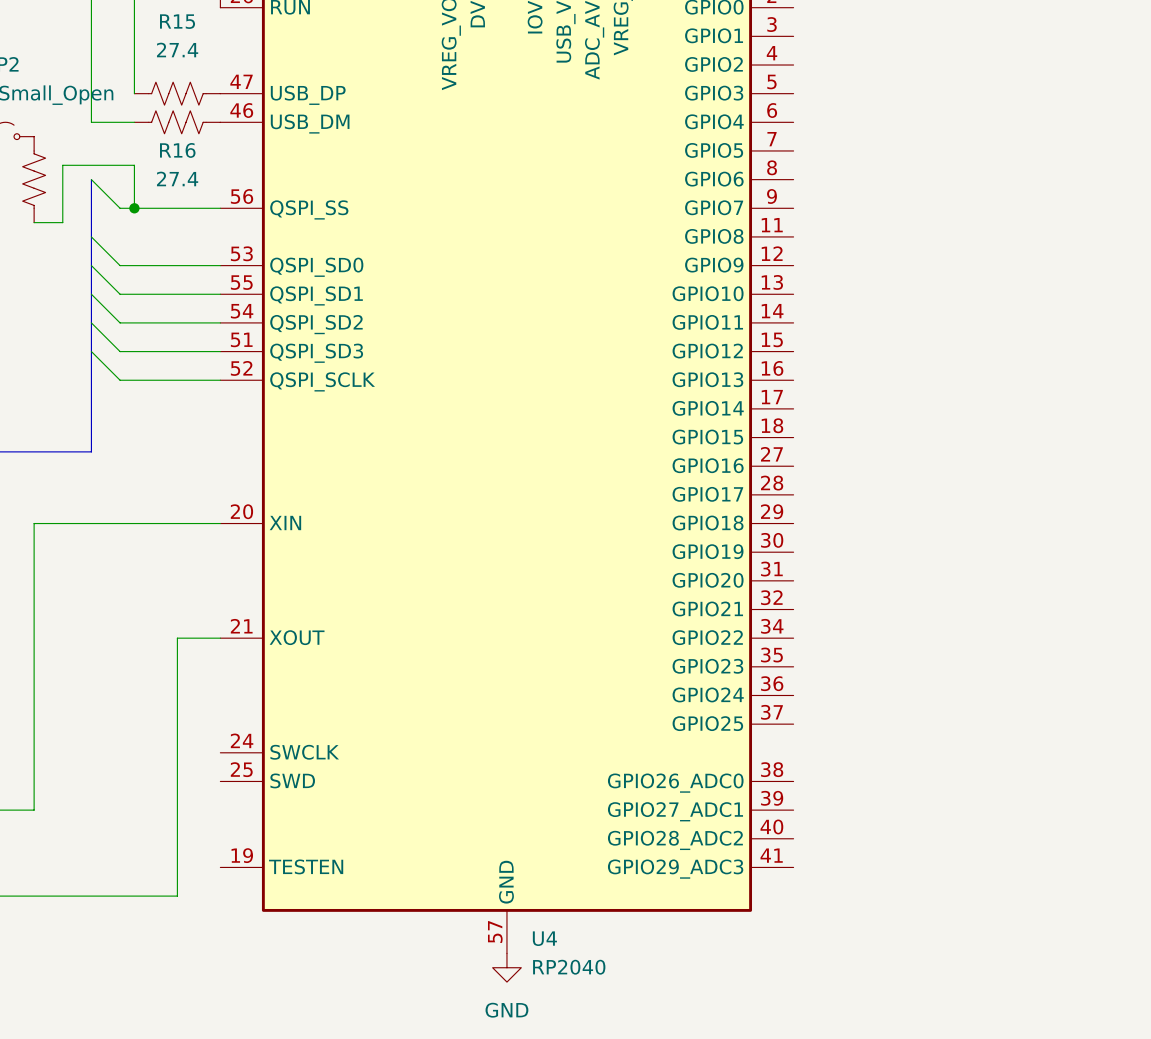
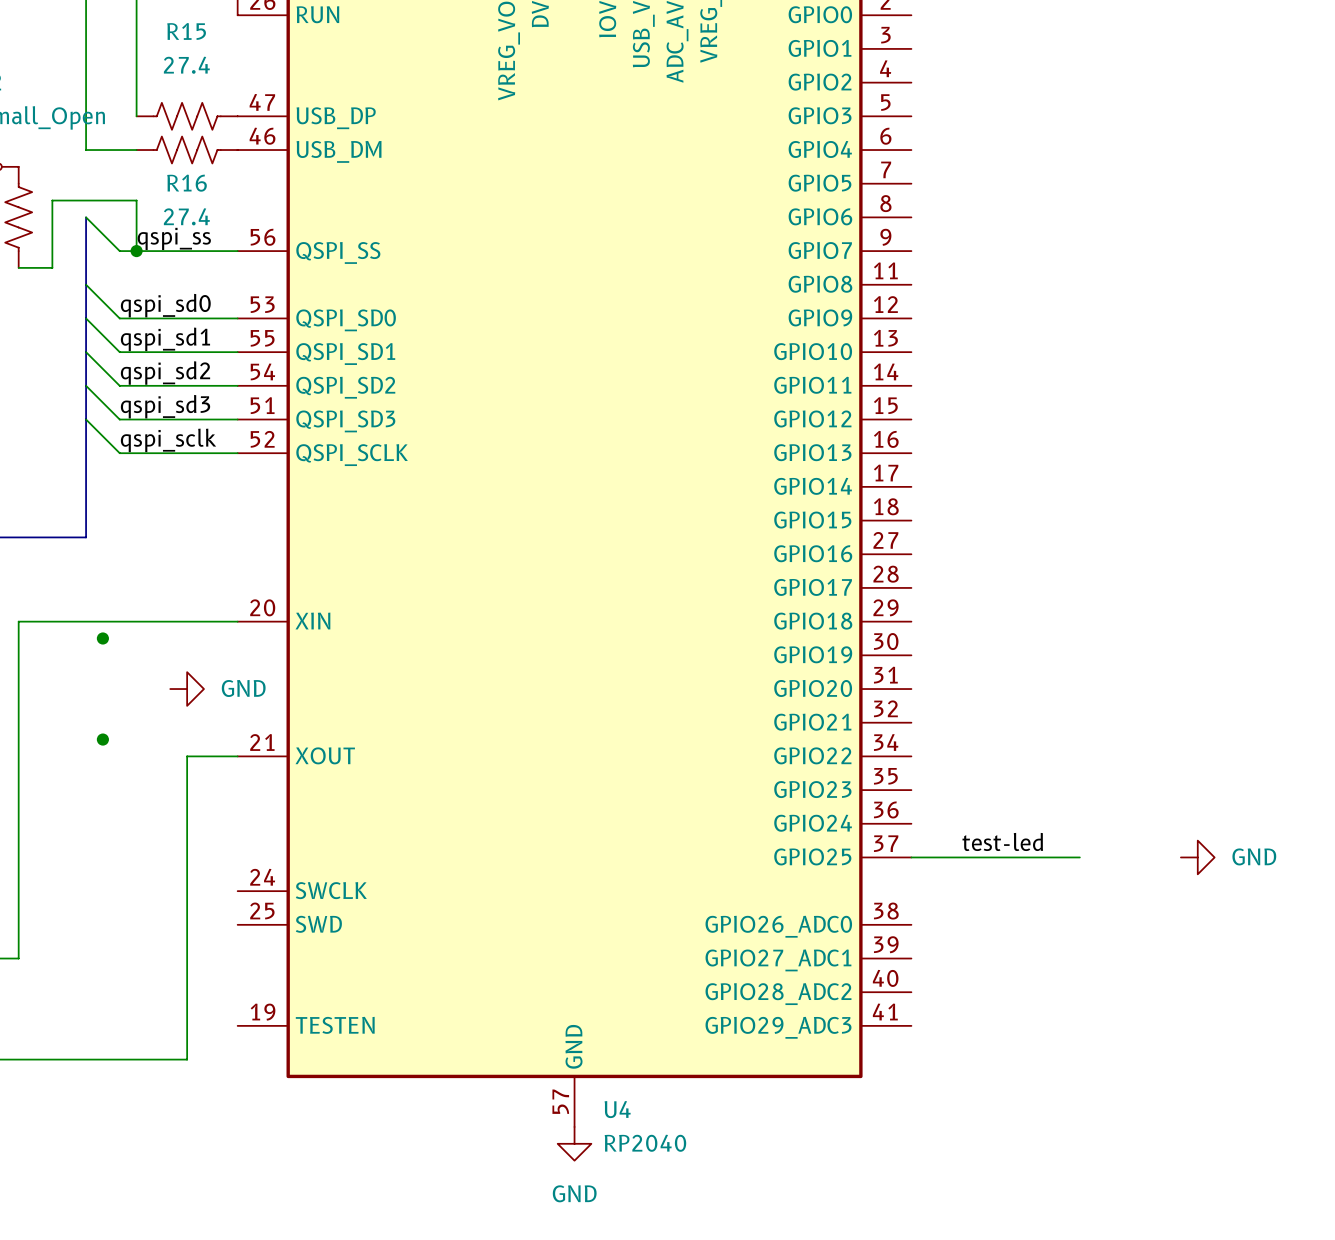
label: none -> qspi_ss (174, 238)
label: none -> qspi_sd0 (165, 305)
label: none -> qspi_sd1 (165, 339)
label: none -> qspi_sd2 (165, 373)
label: none -> qspi_sd3 (165, 406)
label: none -> qspi_sclk (168, 440)
junction: none -> (102, 638)
power symbol: none -> GND (187, 689)
junction: none -> (102, 739)
label: none -> test-led (1002, 841)
wire: none -> (911, 857) (1079, 857)
power symbol: none -> GND (1197, 857)

